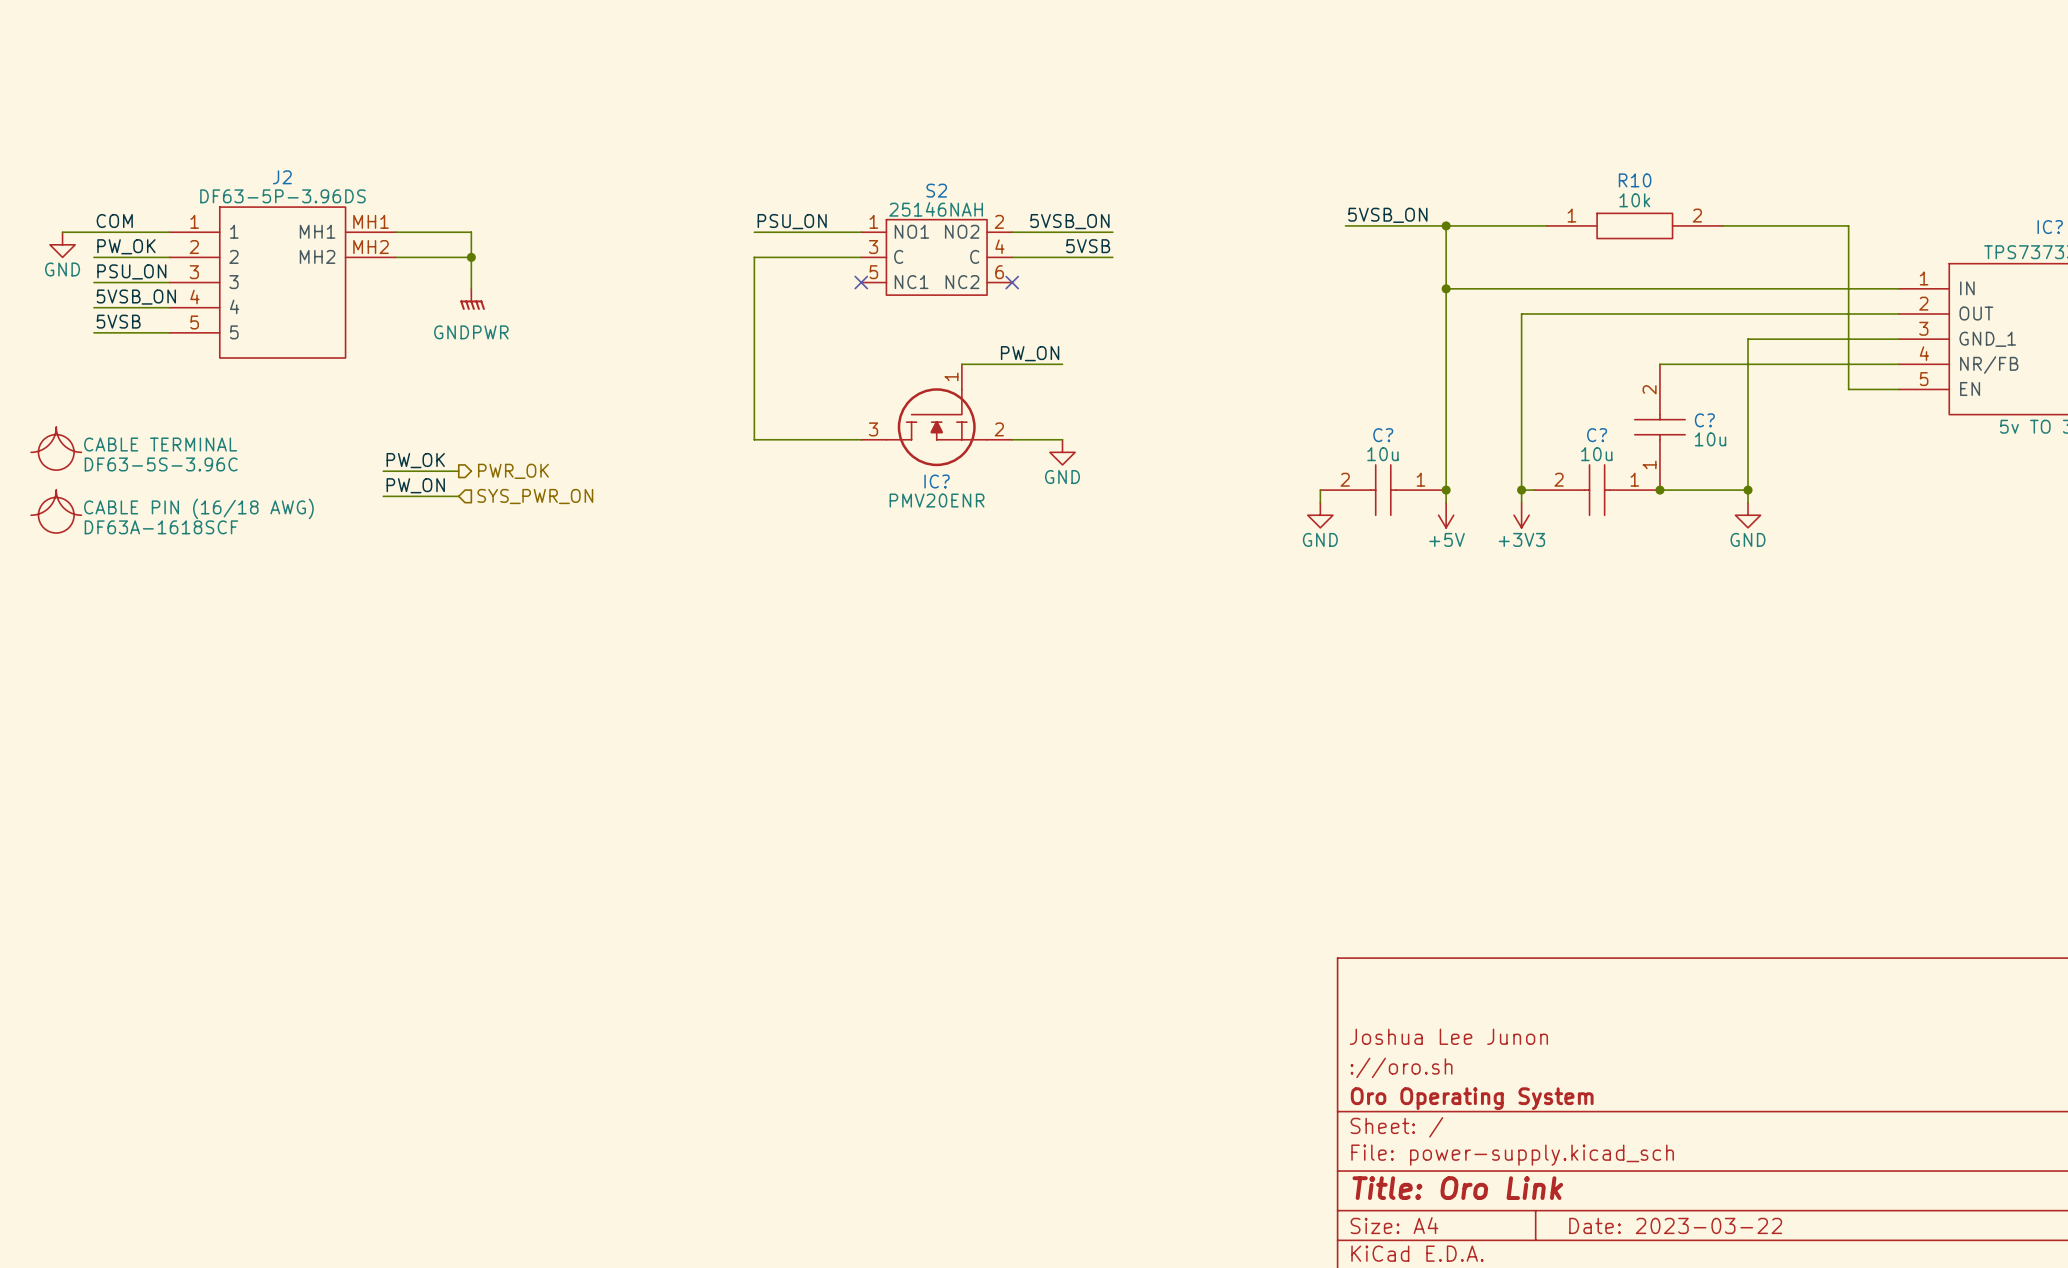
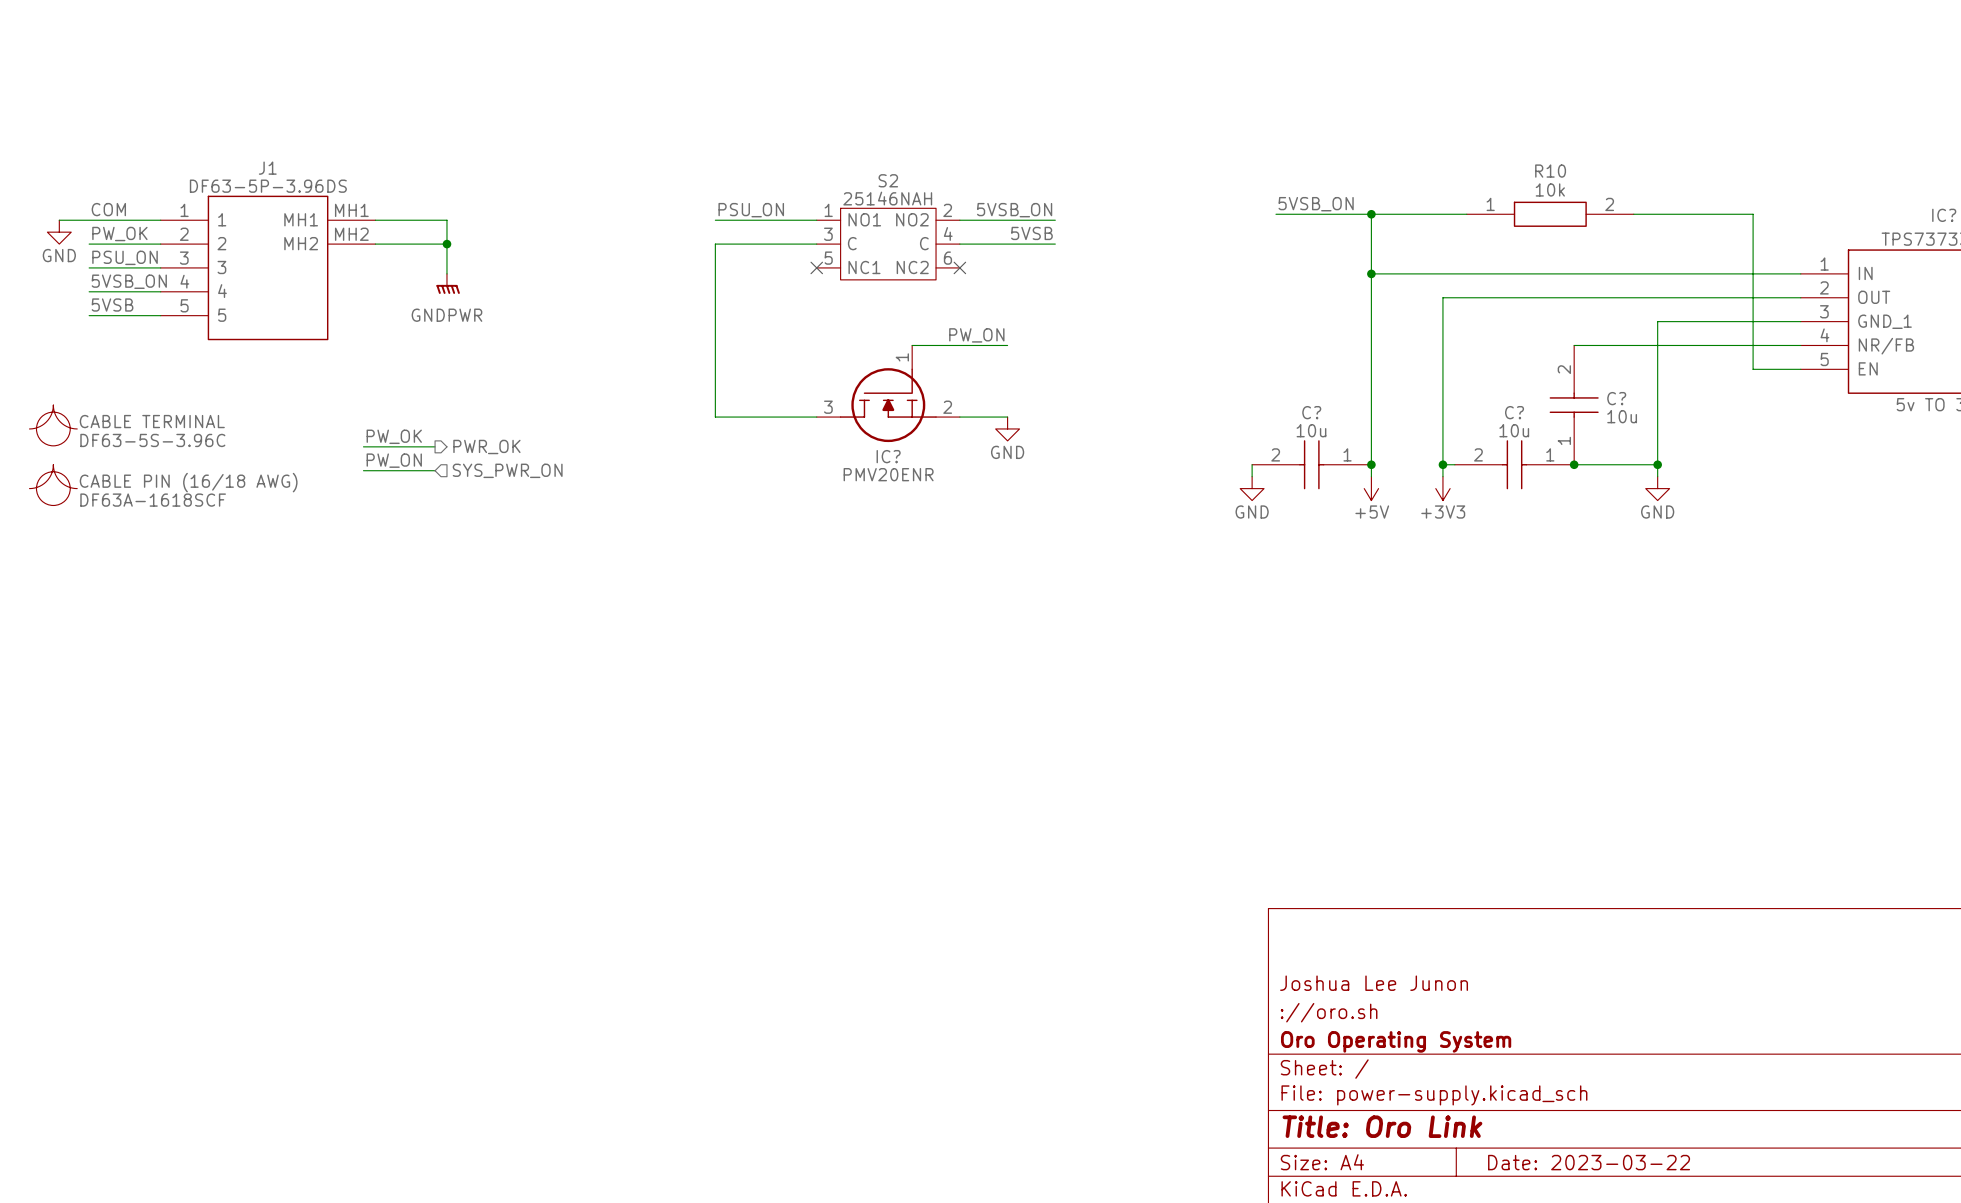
J2 name: J2 (282, 177) -> J1 (267, 168)

